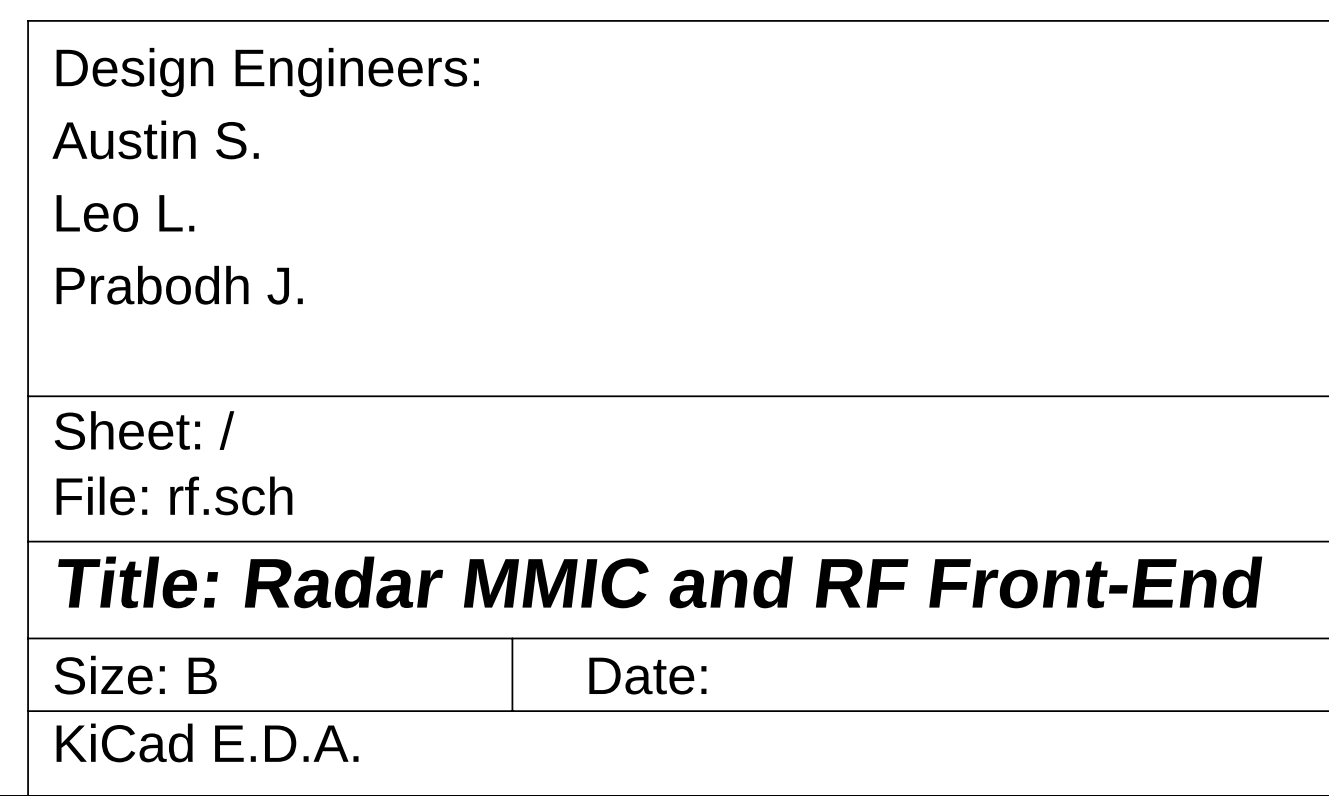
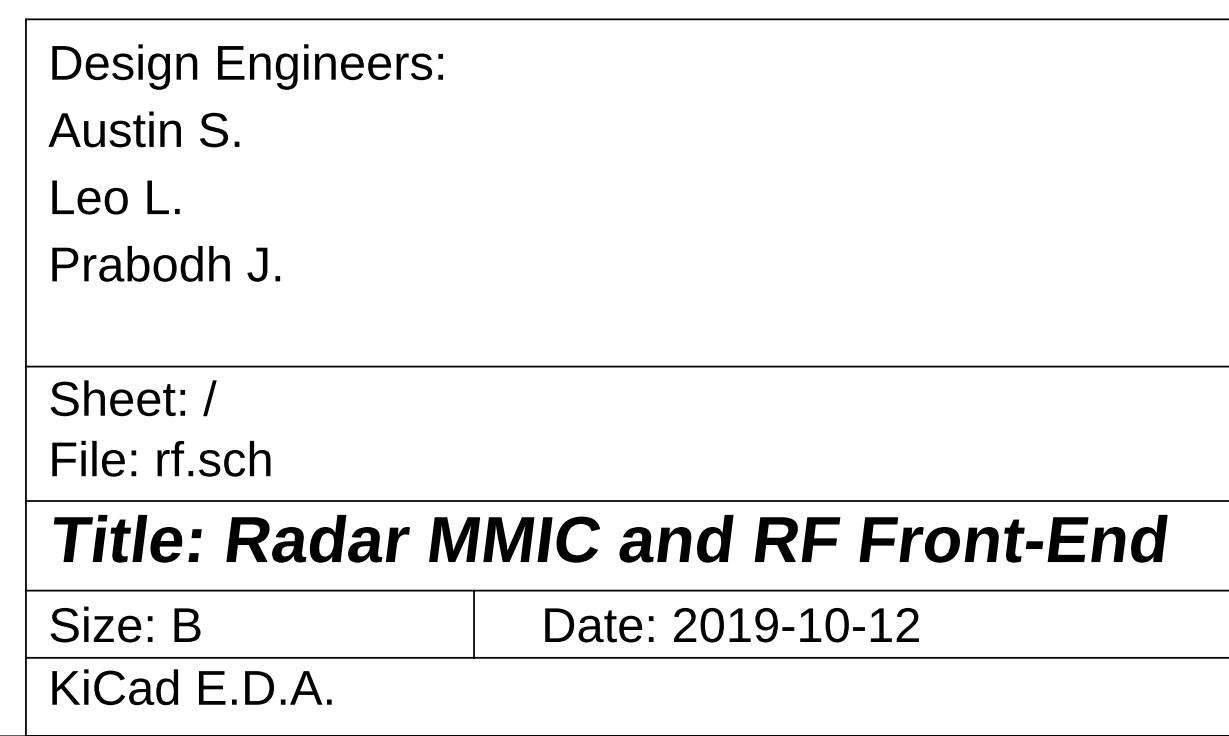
title block: Date: (647, 676) -> Date: 2019-10-12 (732, 625)

